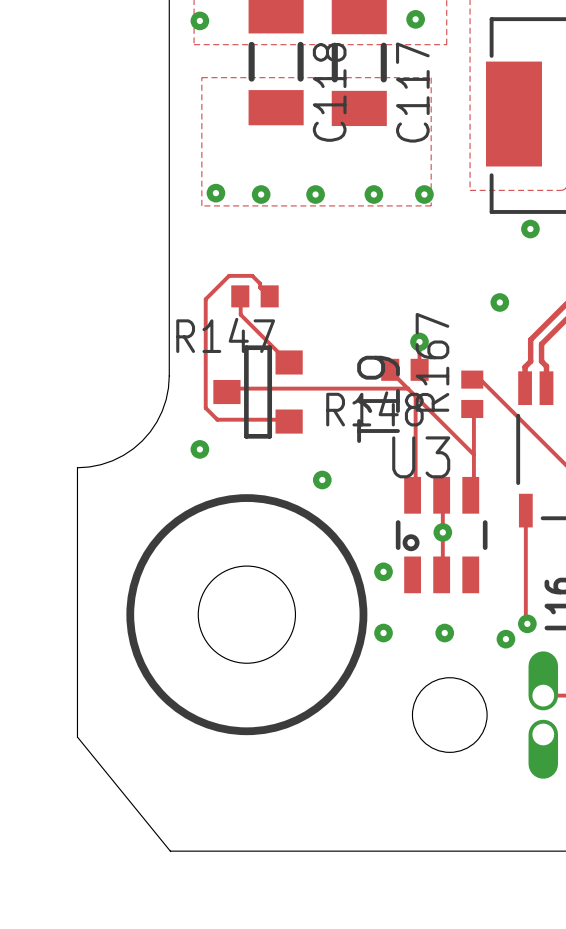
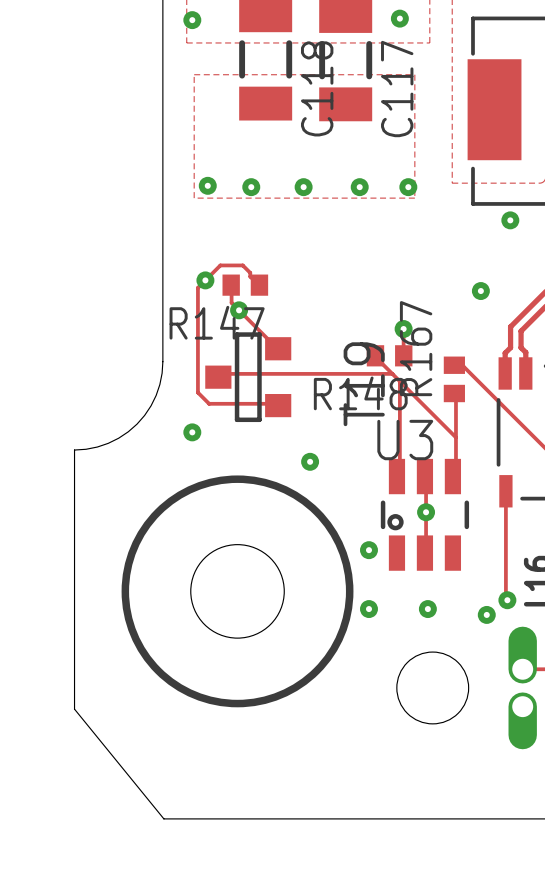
via: none -> (205, 280)
via: none -> (239, 310)

